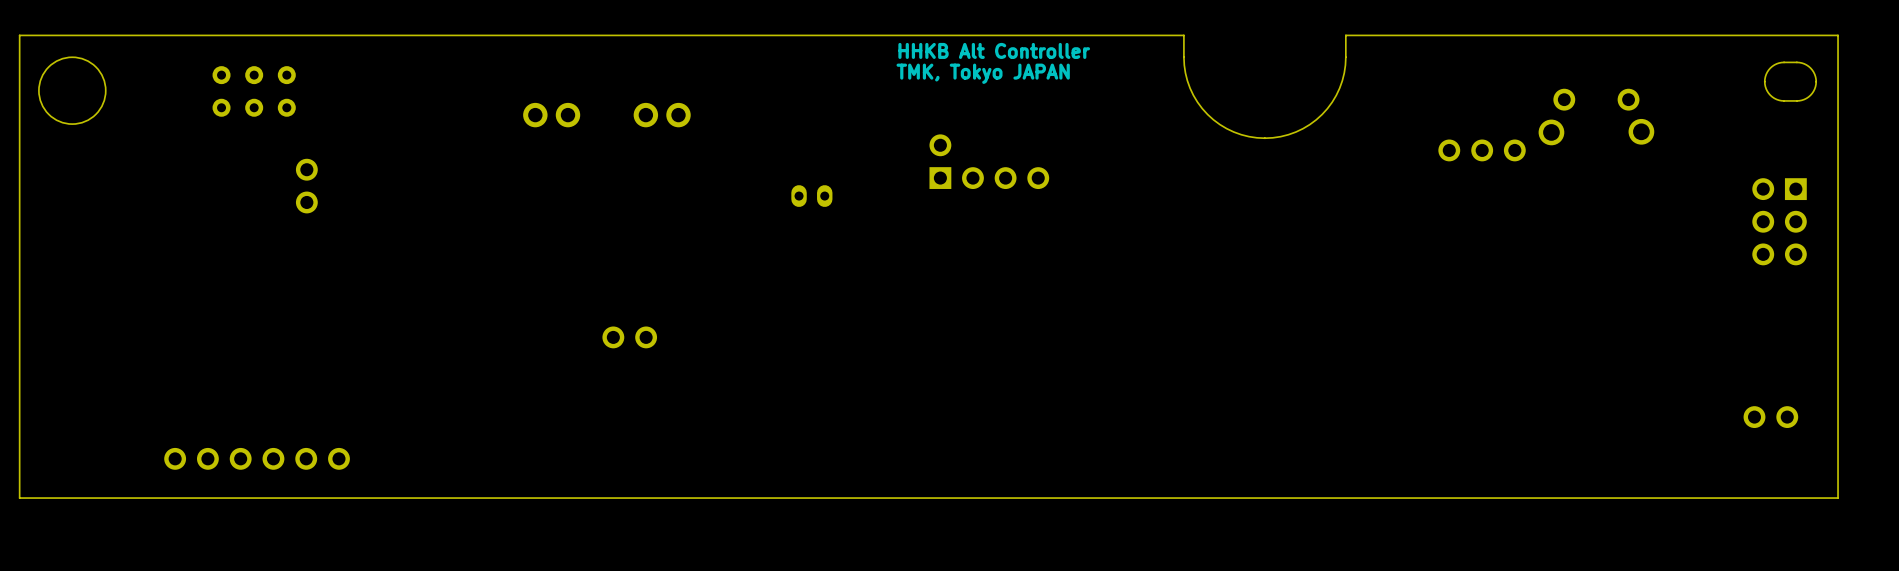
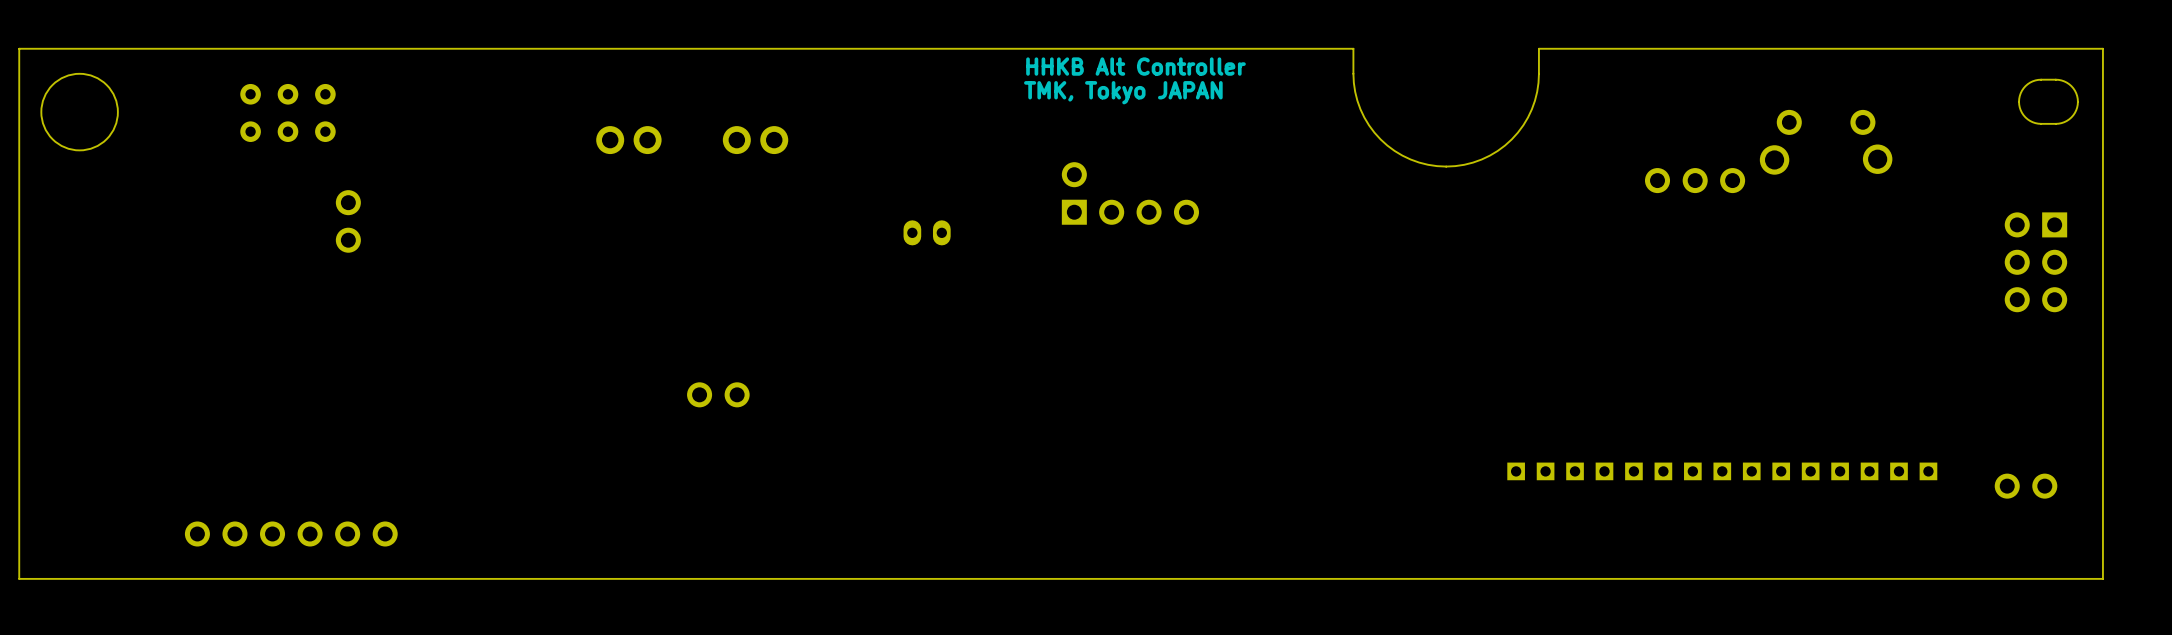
part: none -> (1722, 471)

